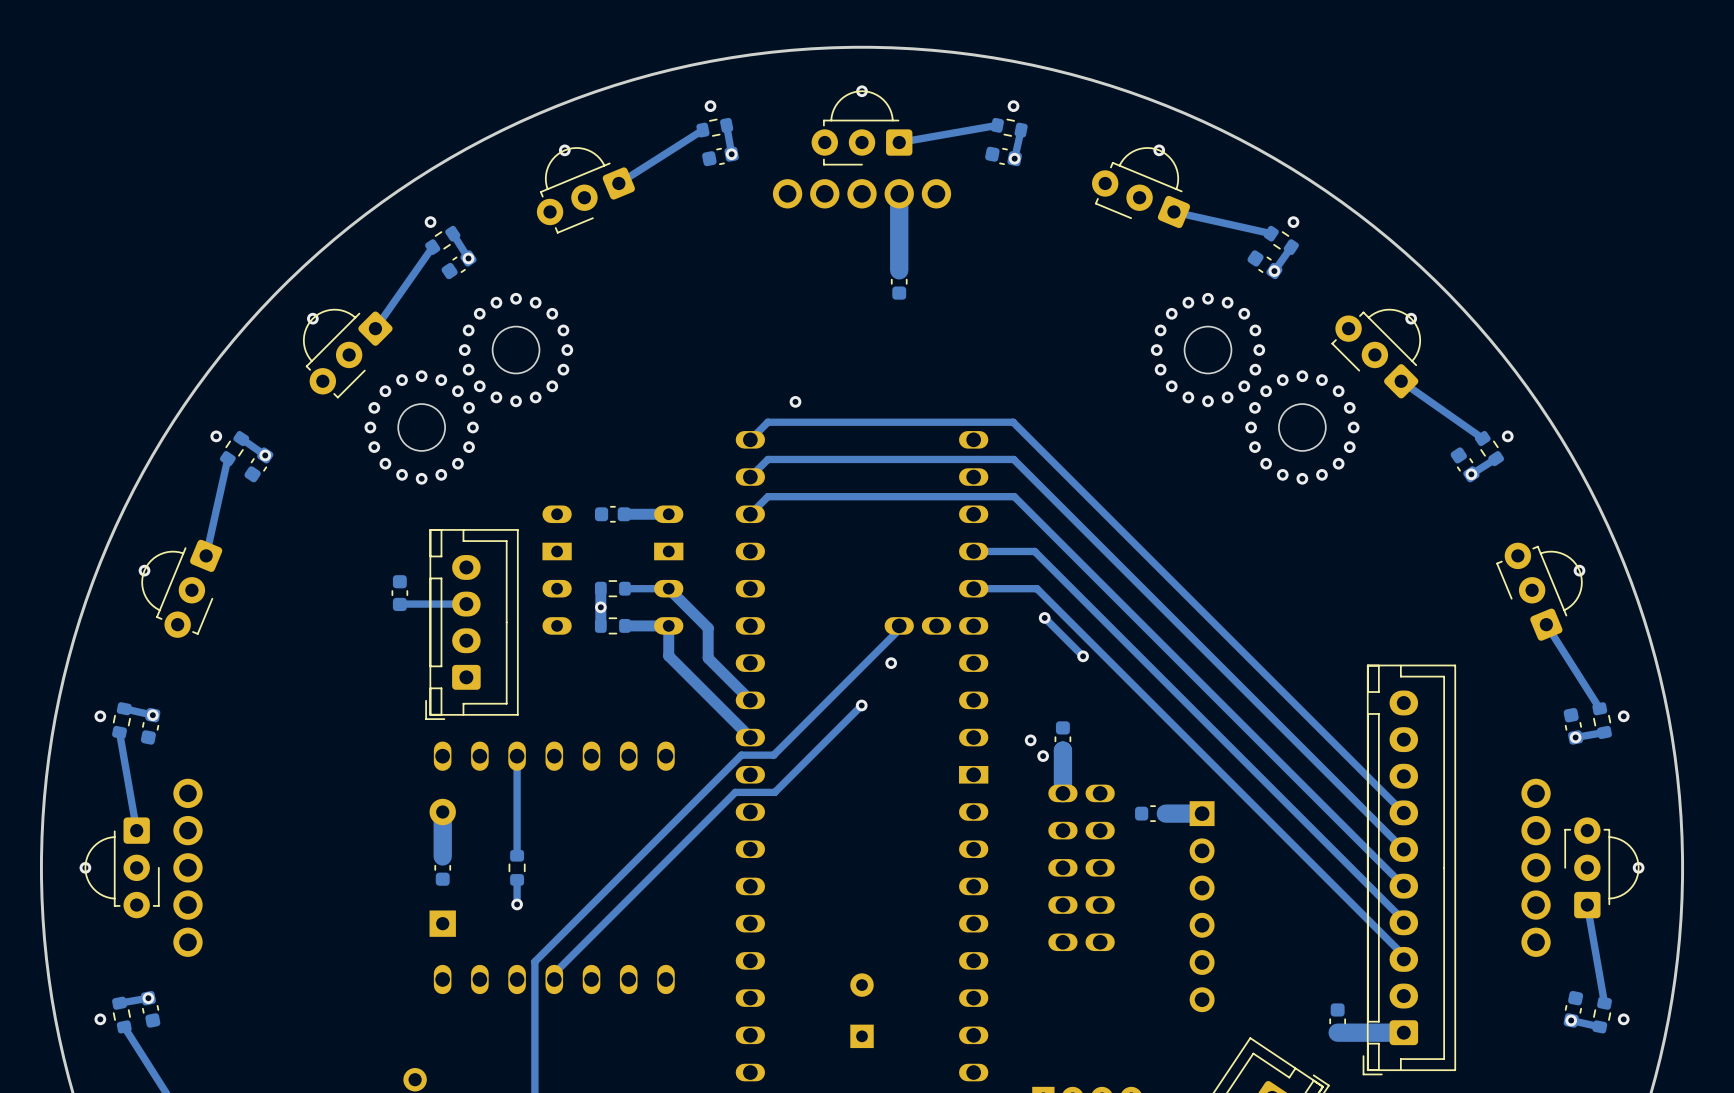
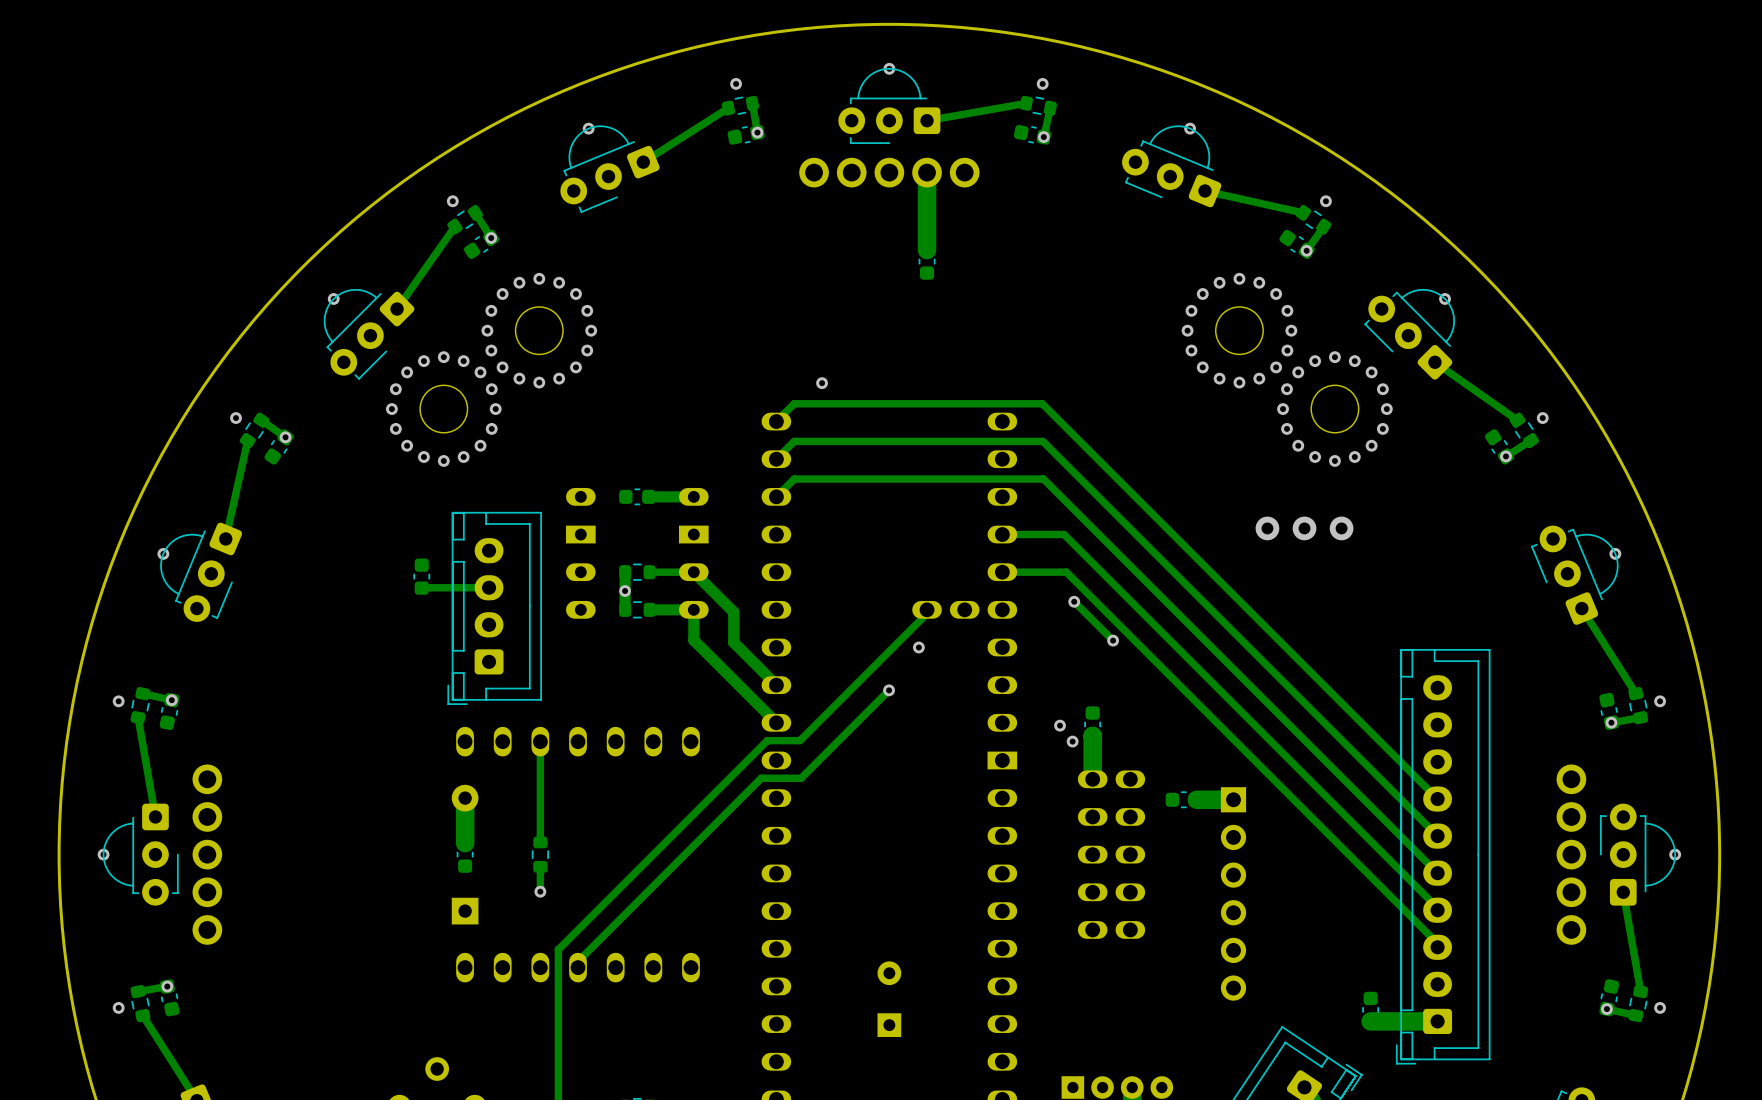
via: none -> (1267, 528)
via: none -> (1304, 528)
via: none -> (1341, 528)

